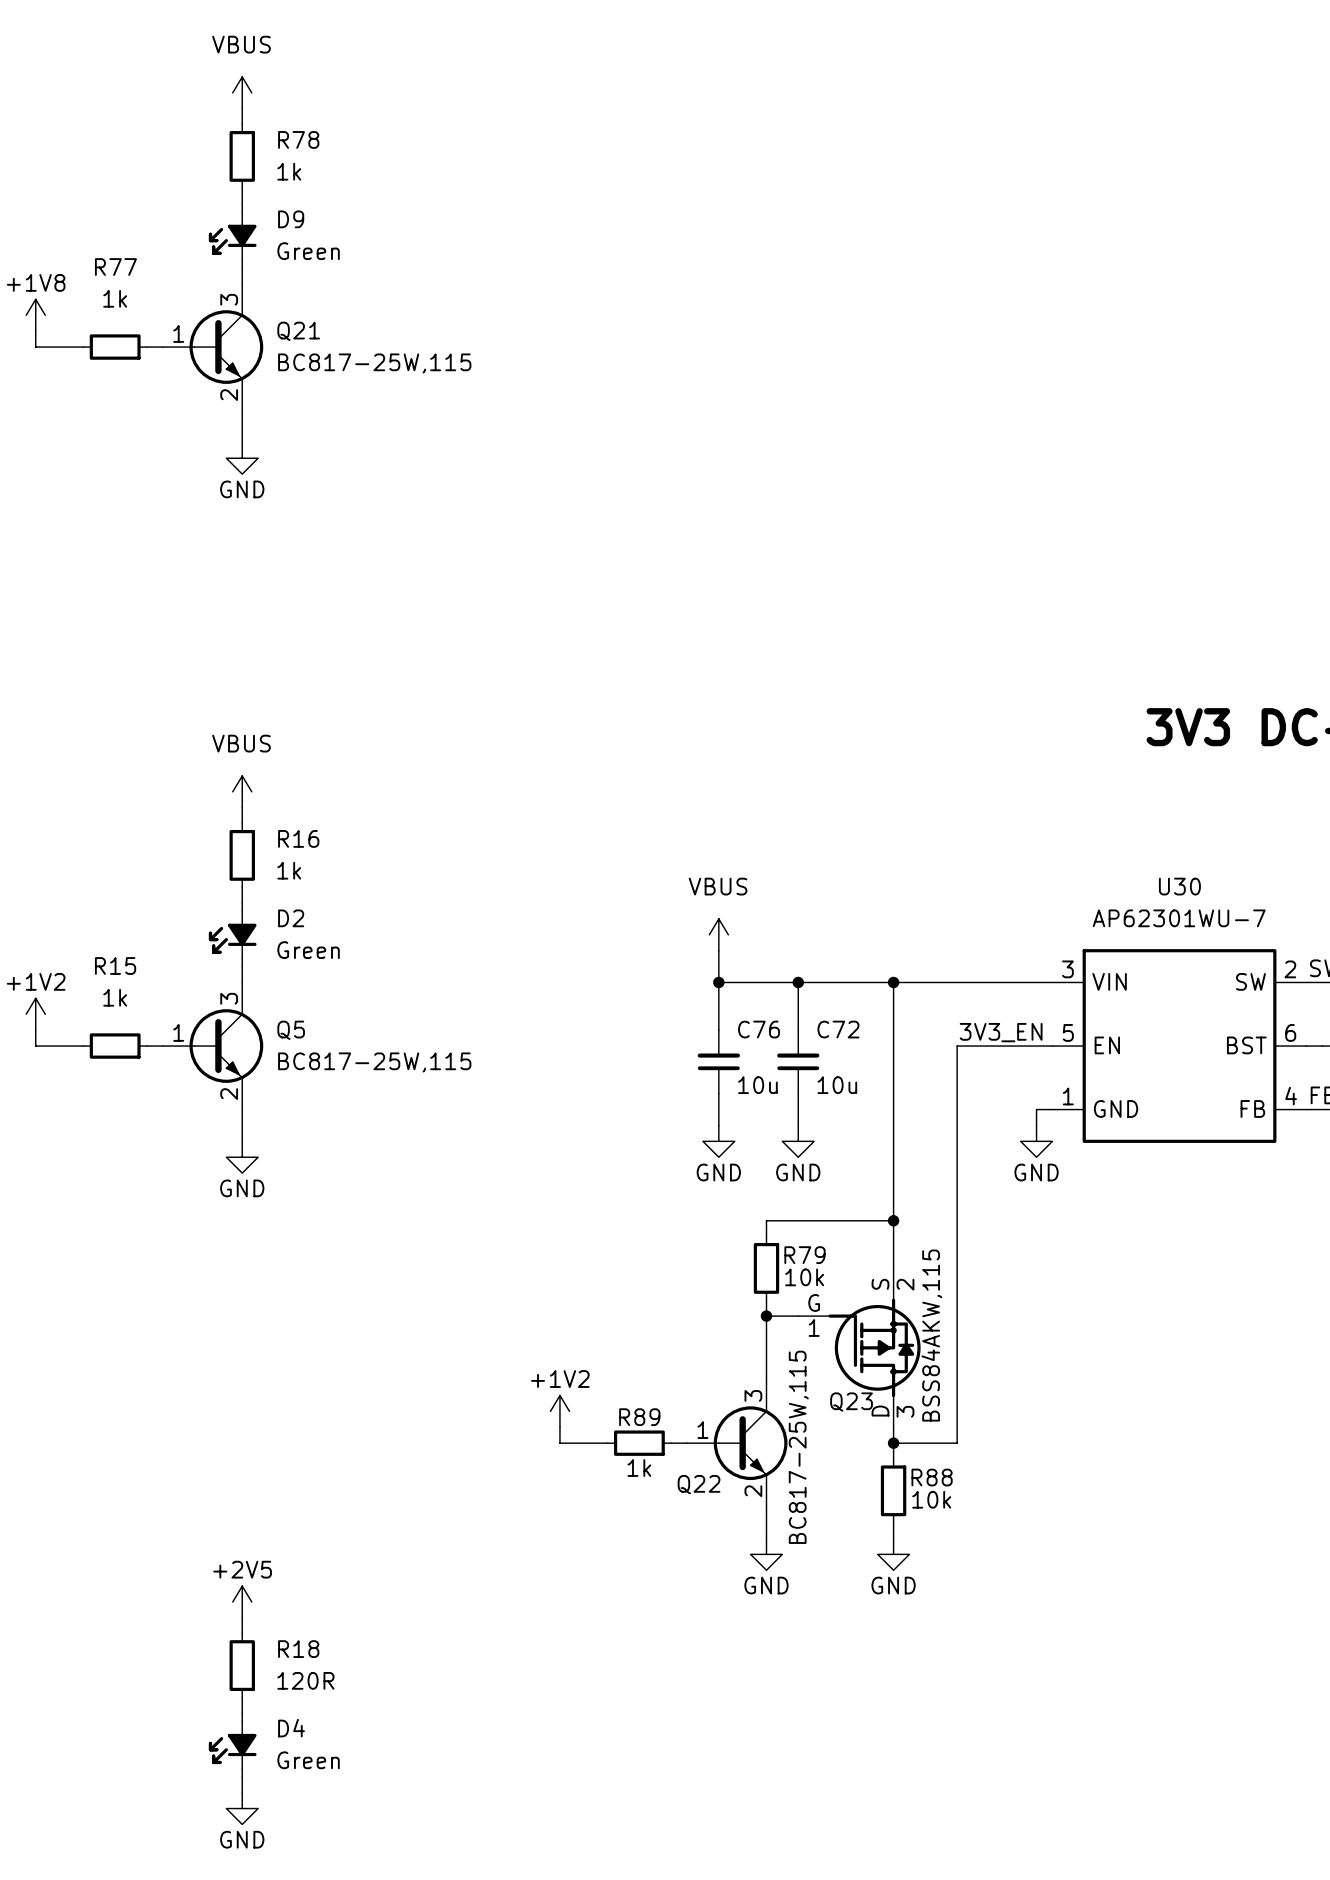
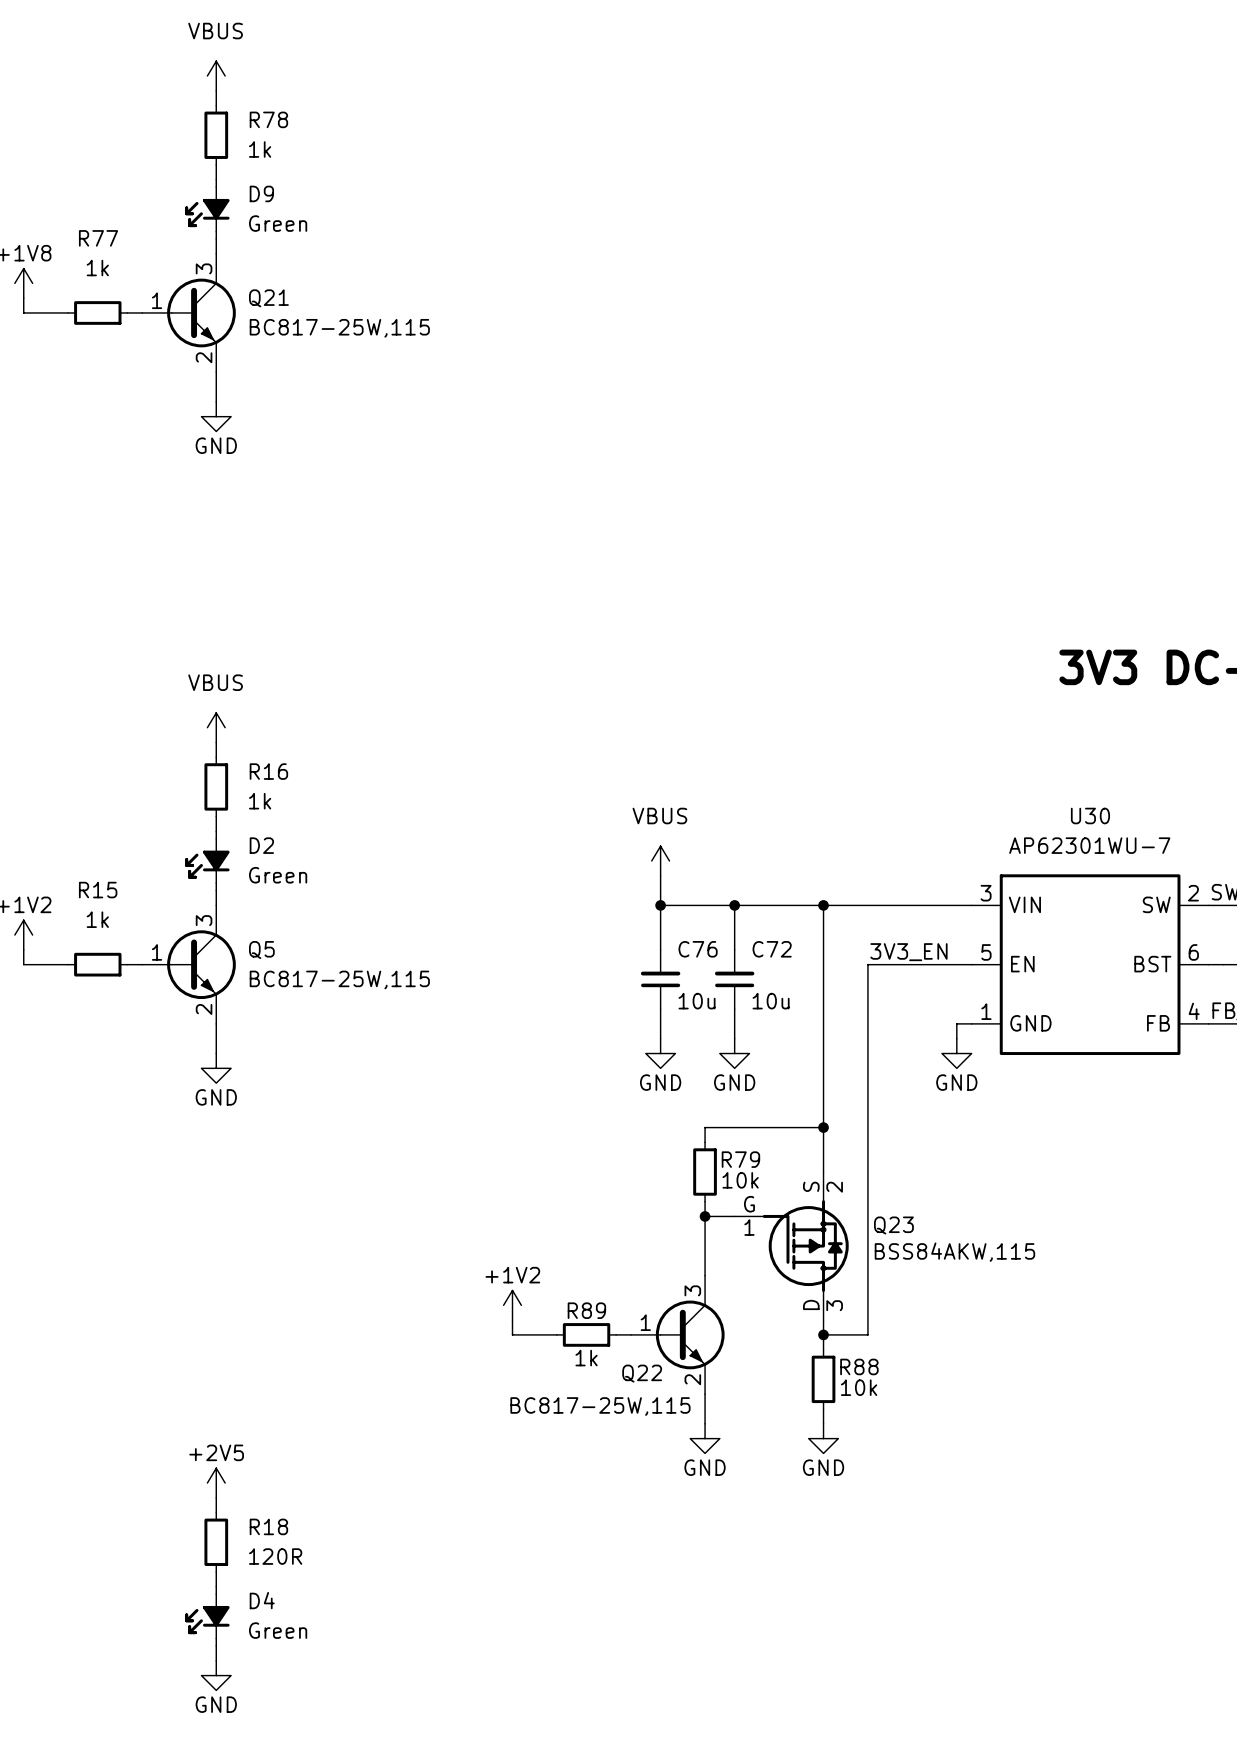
label position: 3V3_EN (1001, 1032) -> 3V3_EN (908, 952)
wire: (957, 1046) (957, 1443) (941, 1443) -> (882, 964) (867, 964) (867, 1334)
Q23 text rotation: 0° (931, 1335) -> 90° clockwise (954, 1252)
Q23 name position: Q23 (851, 1402) -> Q23 (893, 1225)
Q22 text rotation: 0° (798, 1447) -> 90° clockwise (600, 1406)

